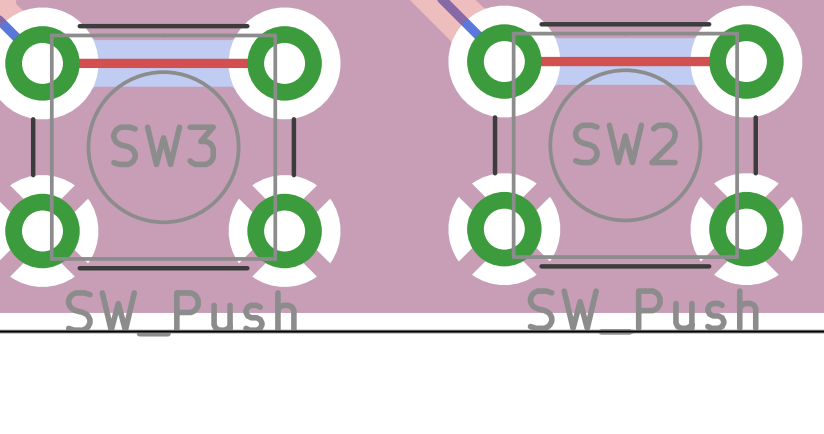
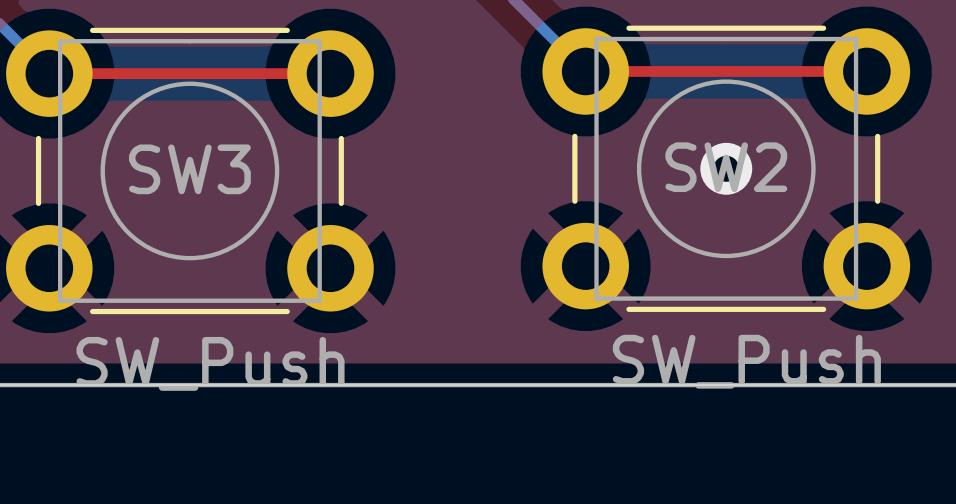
via: none -> (726, 168)

